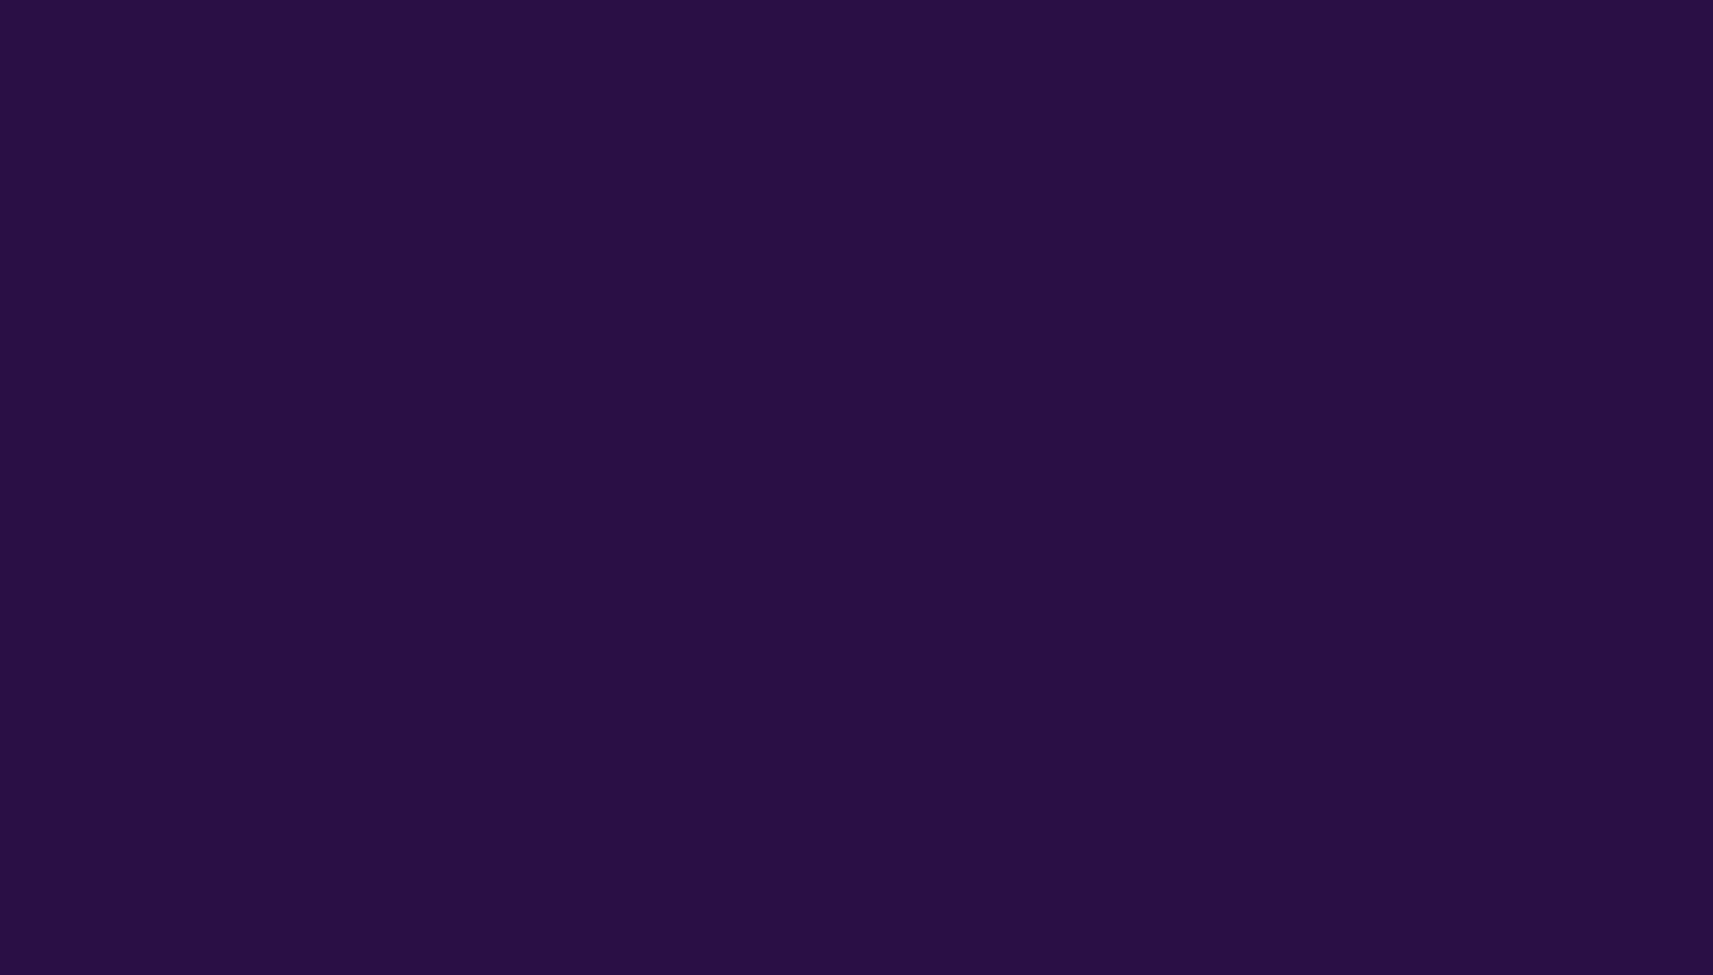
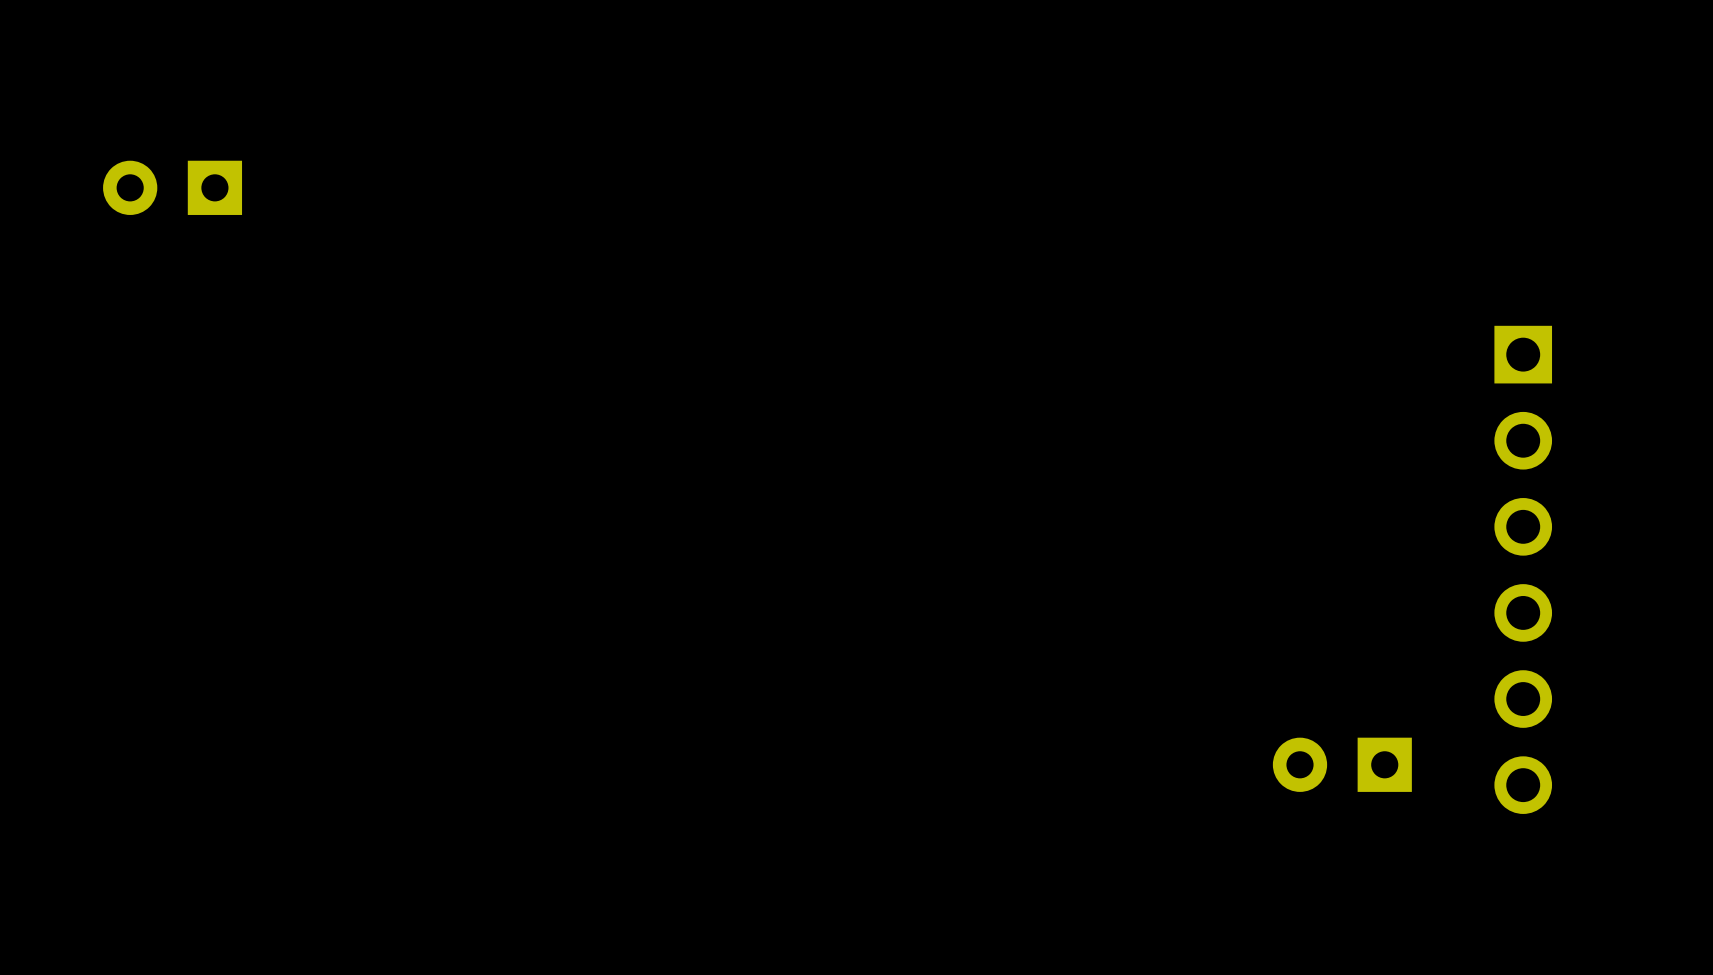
part: none -> (172, 187)
part: none -> (1523, 569)
part: none -> (1342, 764)

